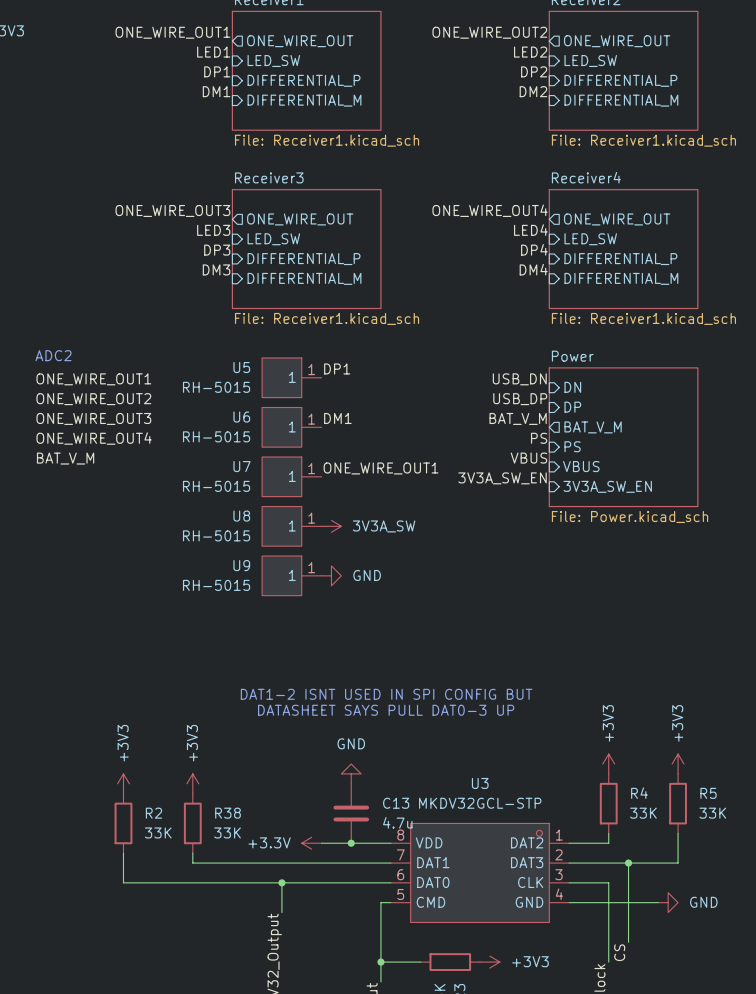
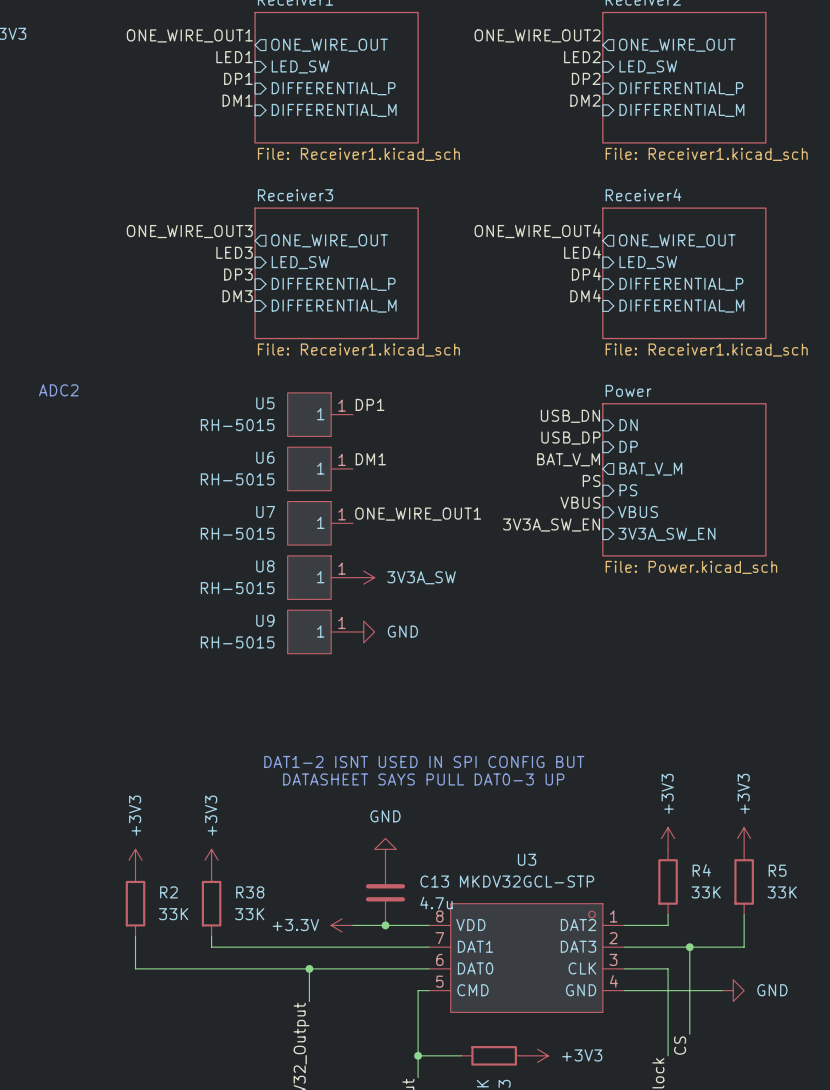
label: ONE_WIRE_OUT1 (93, 379) -> none
label: ONE_WIRE_OUT2 (93, 399) -> none
label: ONE_WIRE_OUT3 (93, 418) -> none
label: ONE_WIRE_OUT4 (94, 438) -> none
label: BAT_V_M (65, 458) -> none

